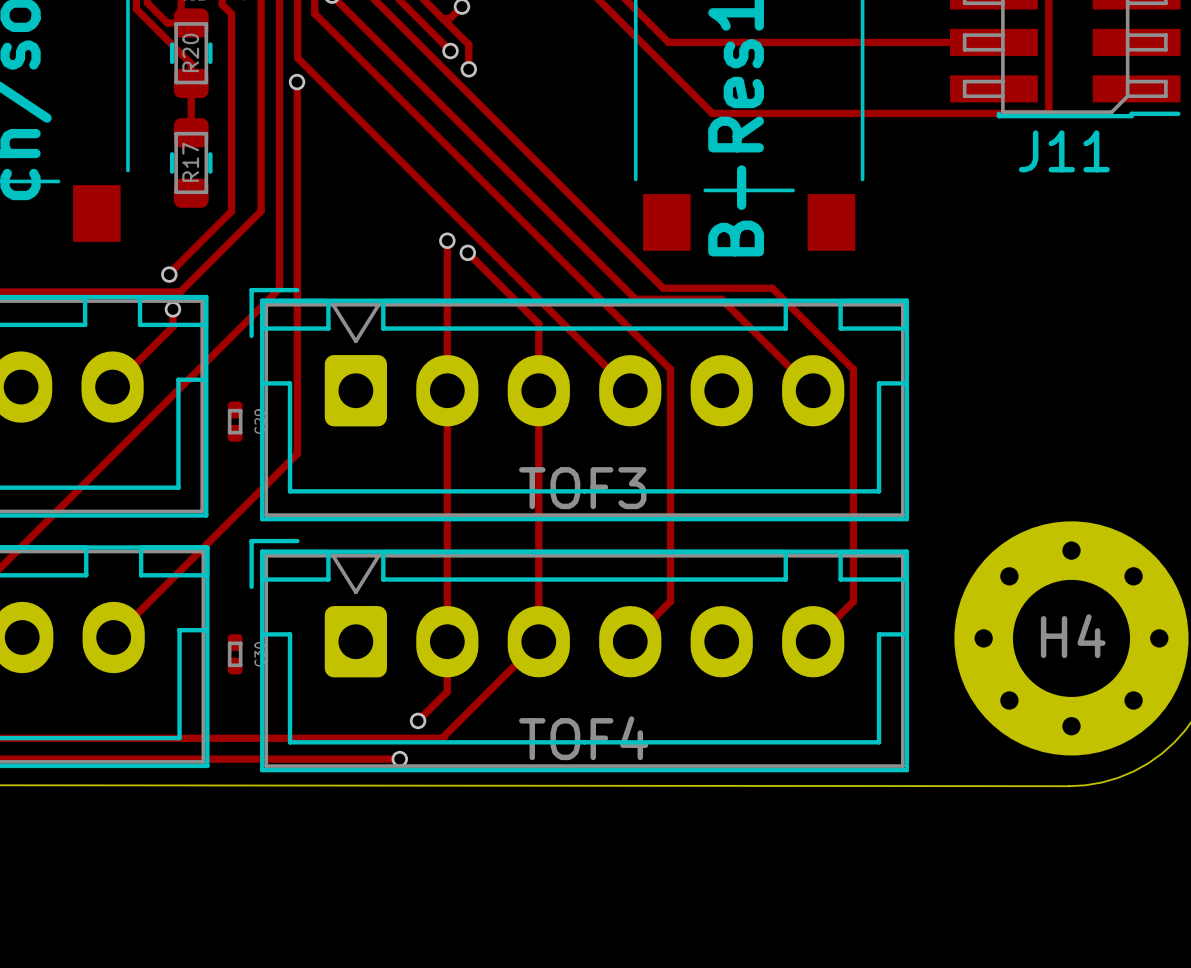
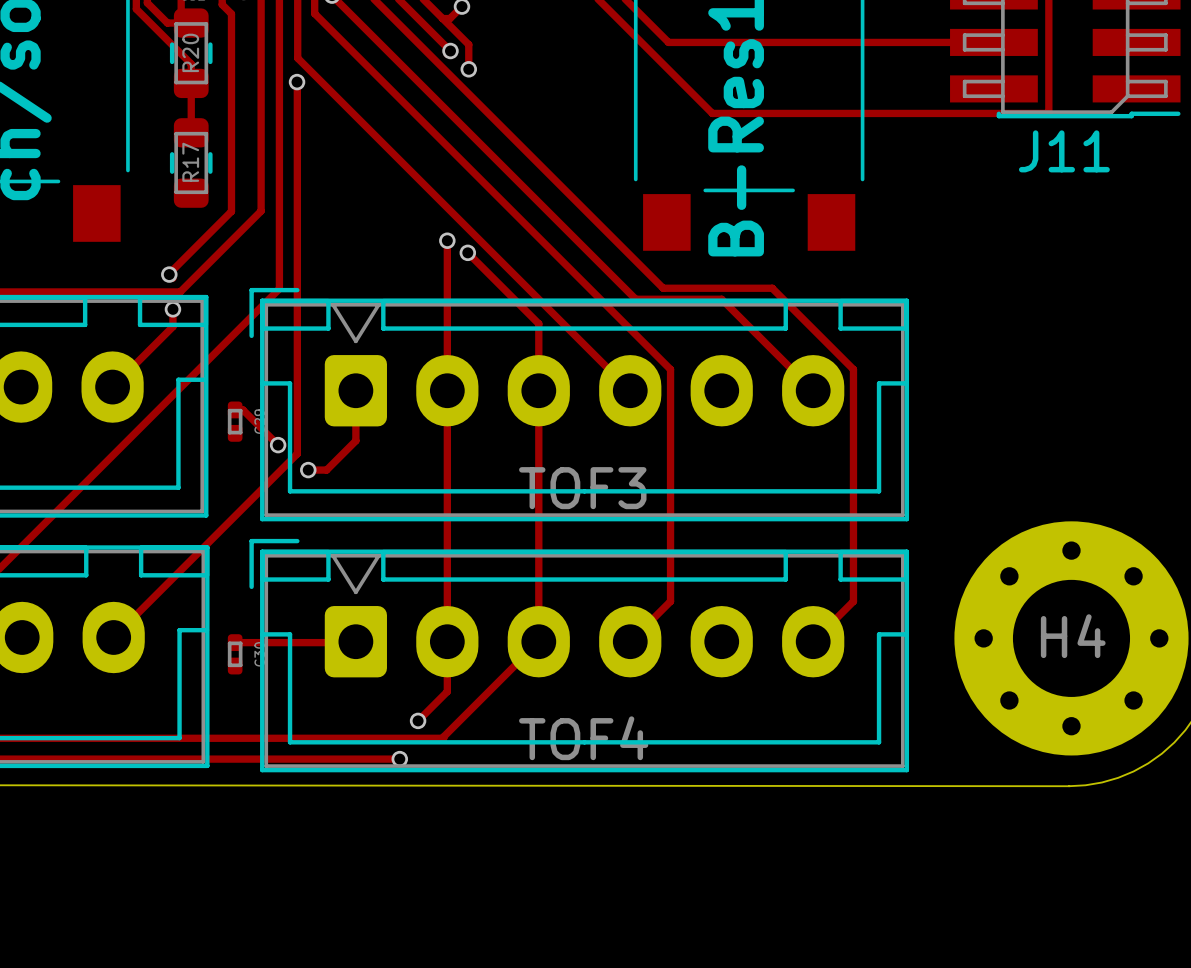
track: none -> (355, 390) (355, 440) (326, 470) (308, 470)
track: none -> (235, 409) (242, 409) (278, 445)
via: none -> (278, 445)
via: none -> (308, 470)
track: none -> (355, 641) (235, 642)

